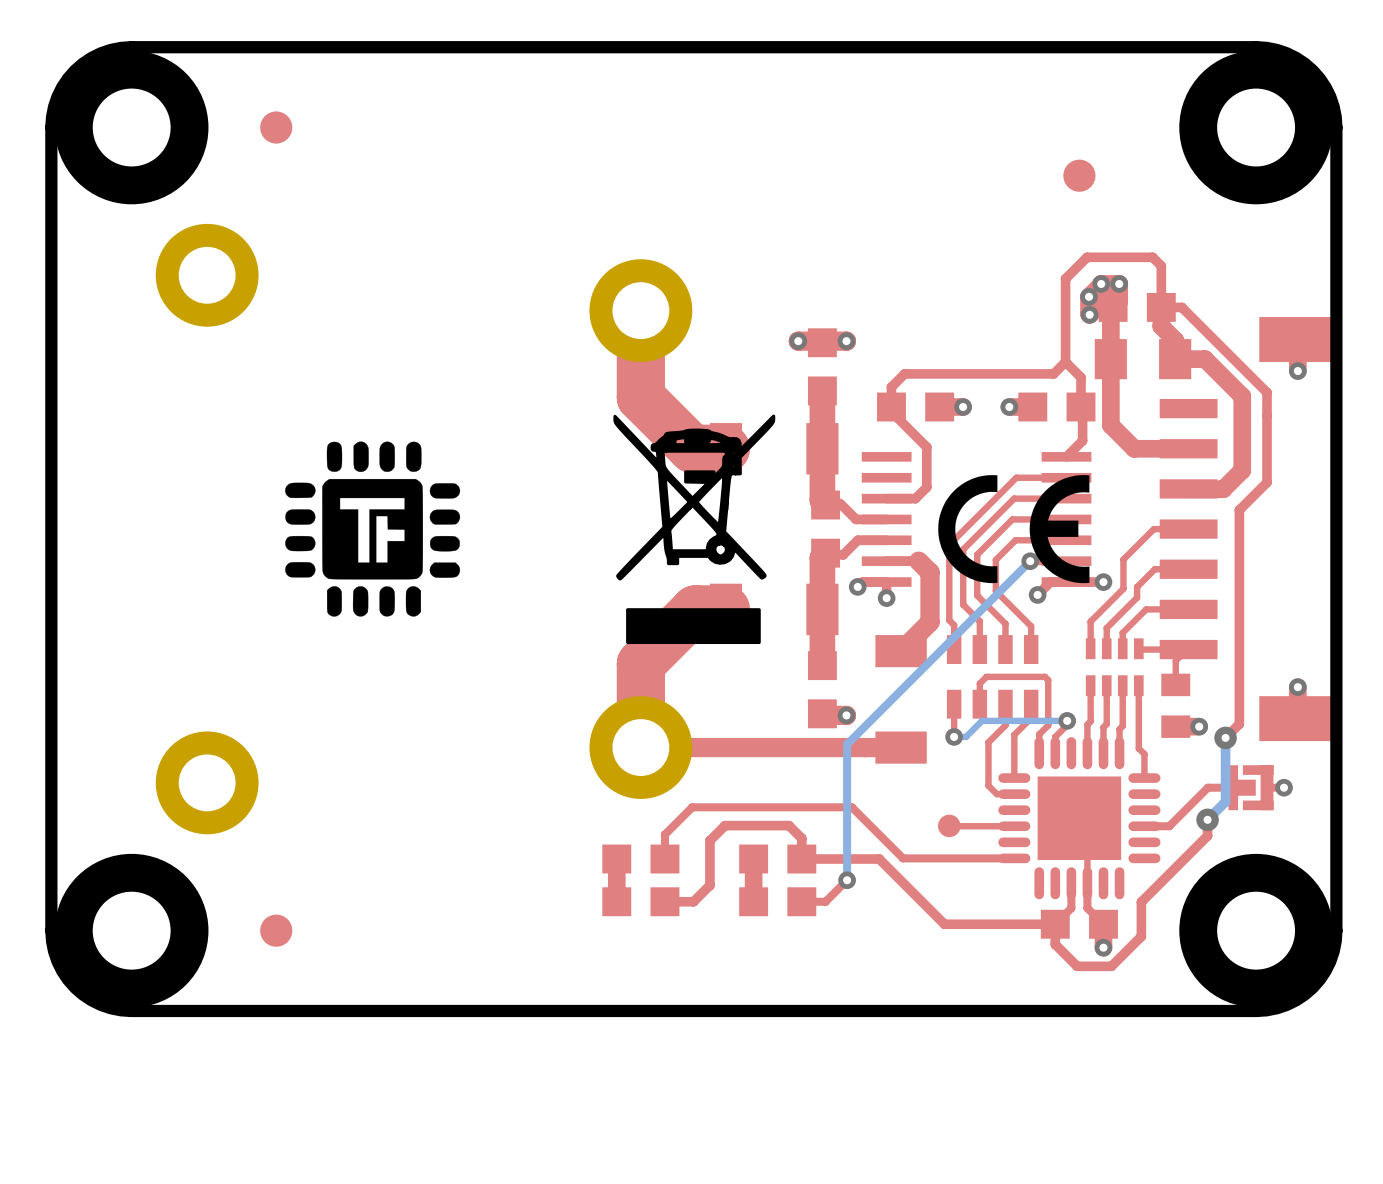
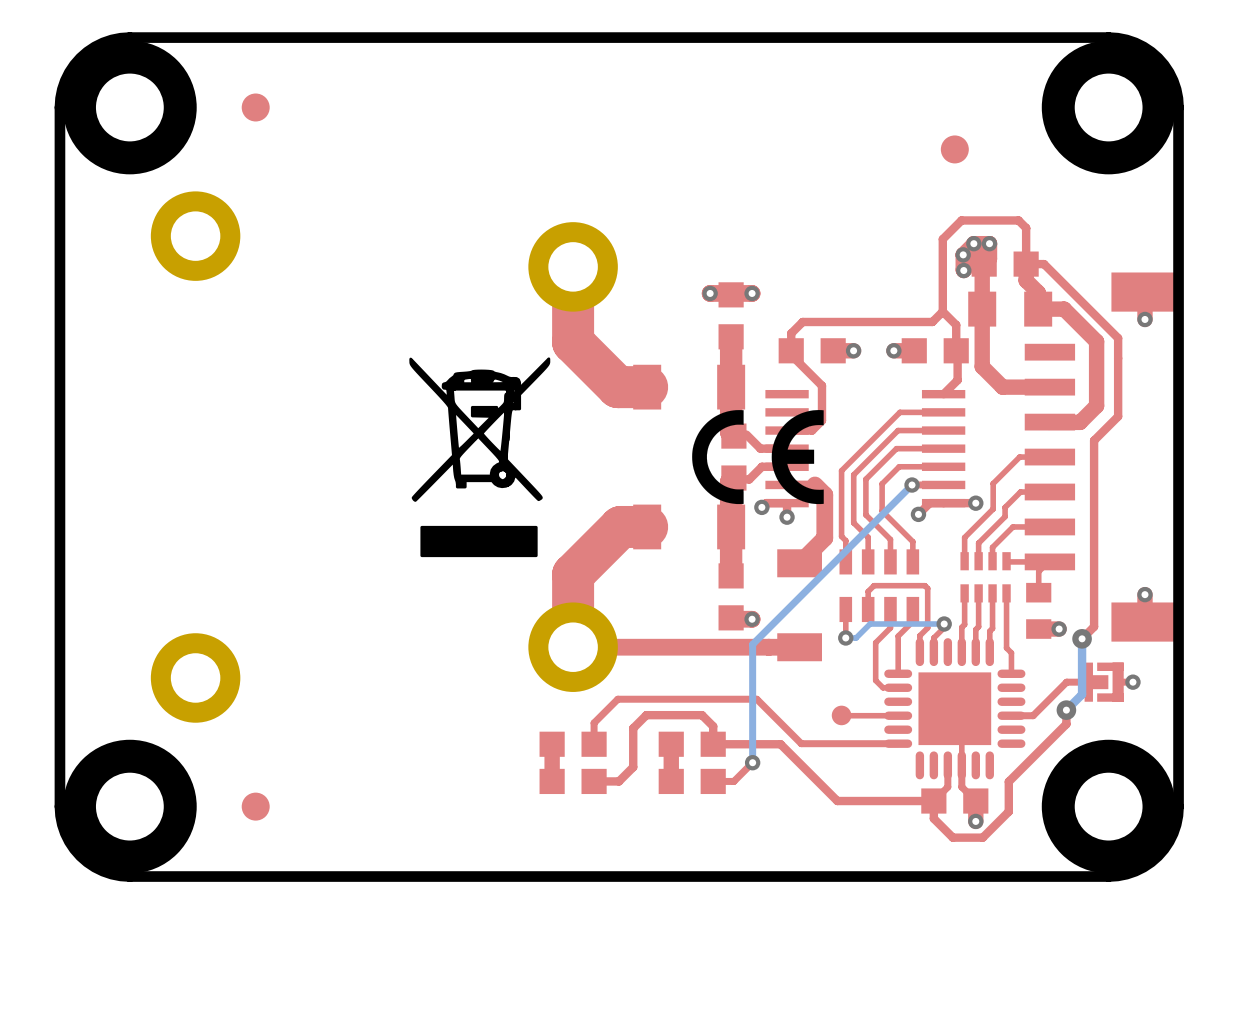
drawing: [285, 441, 461, 617] -> none
drawing position: (694, 529) -> (479, 457)
drawing position: (1013, 529) -> (757, 457)

